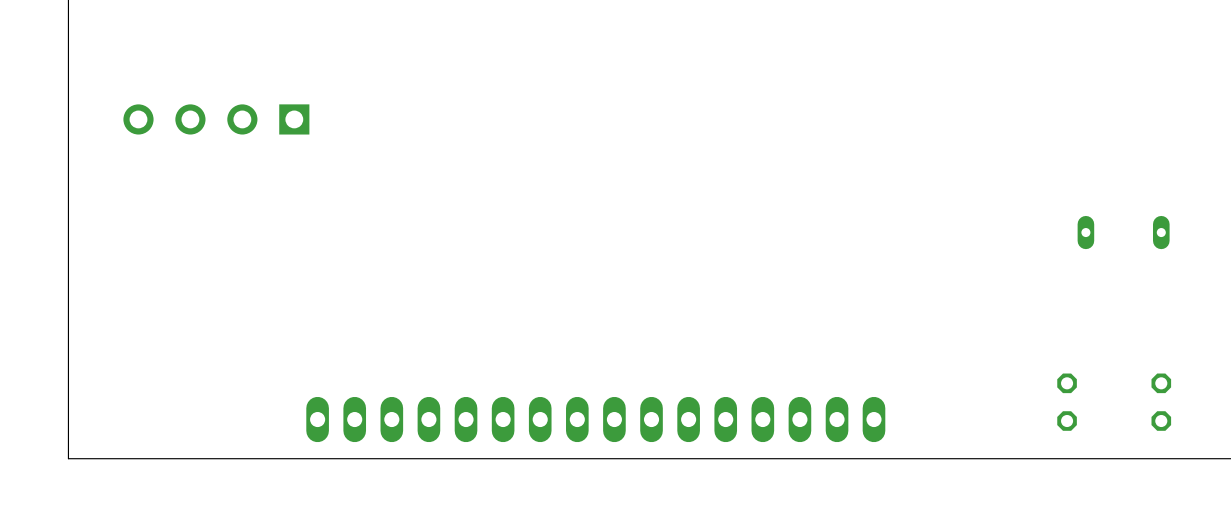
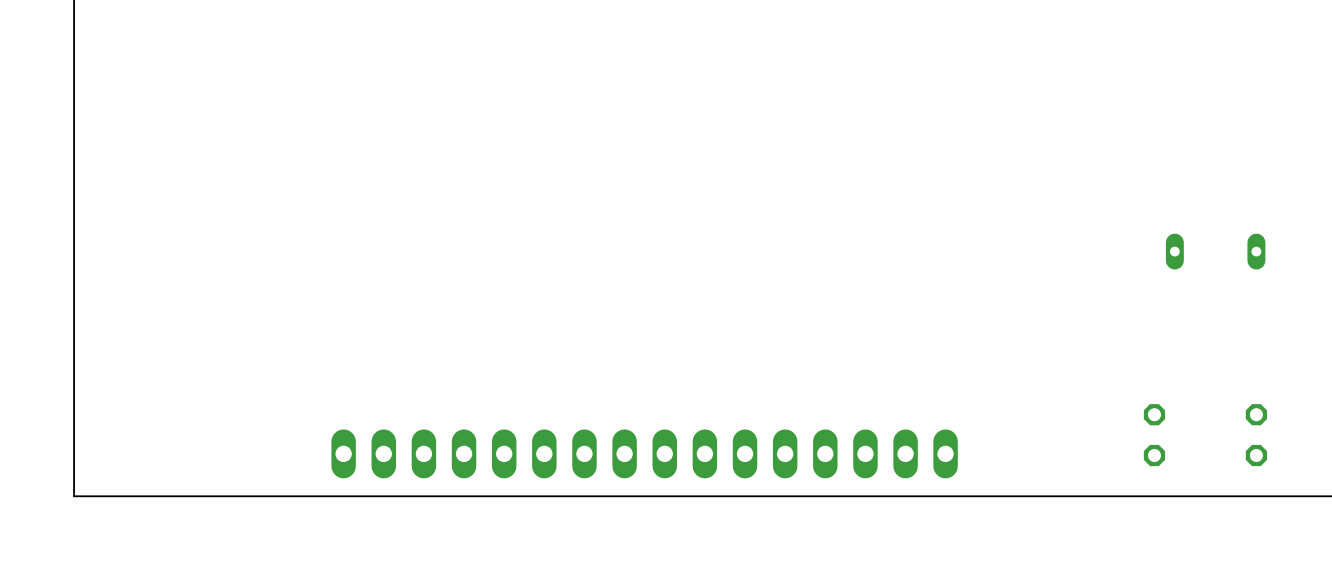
part: (216, 119) -> none

